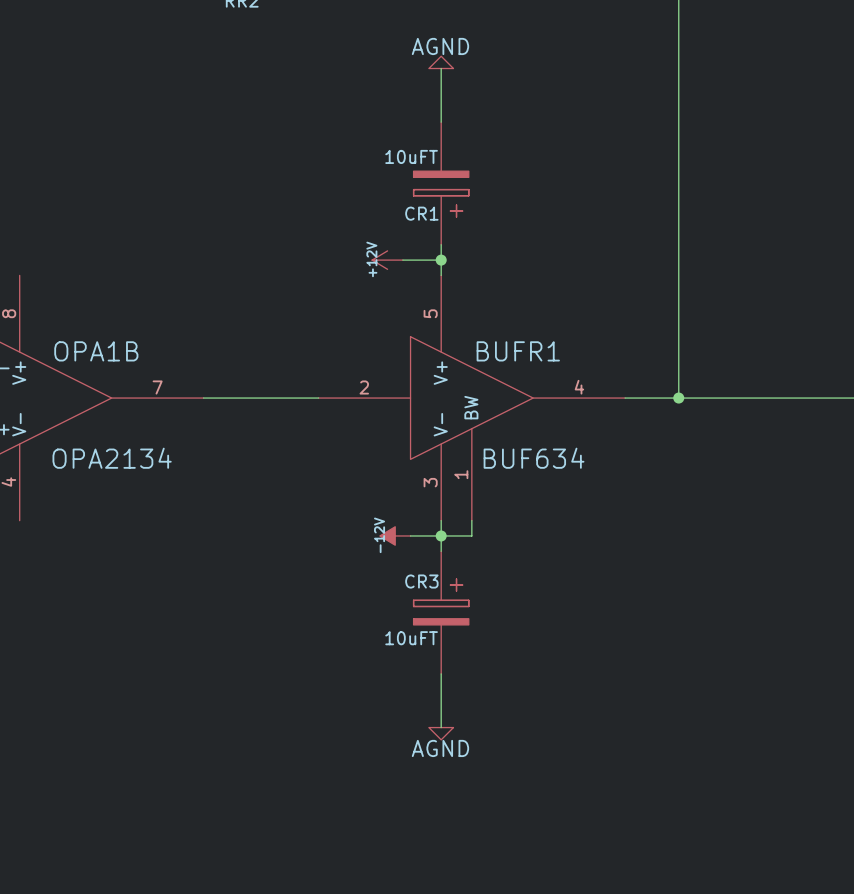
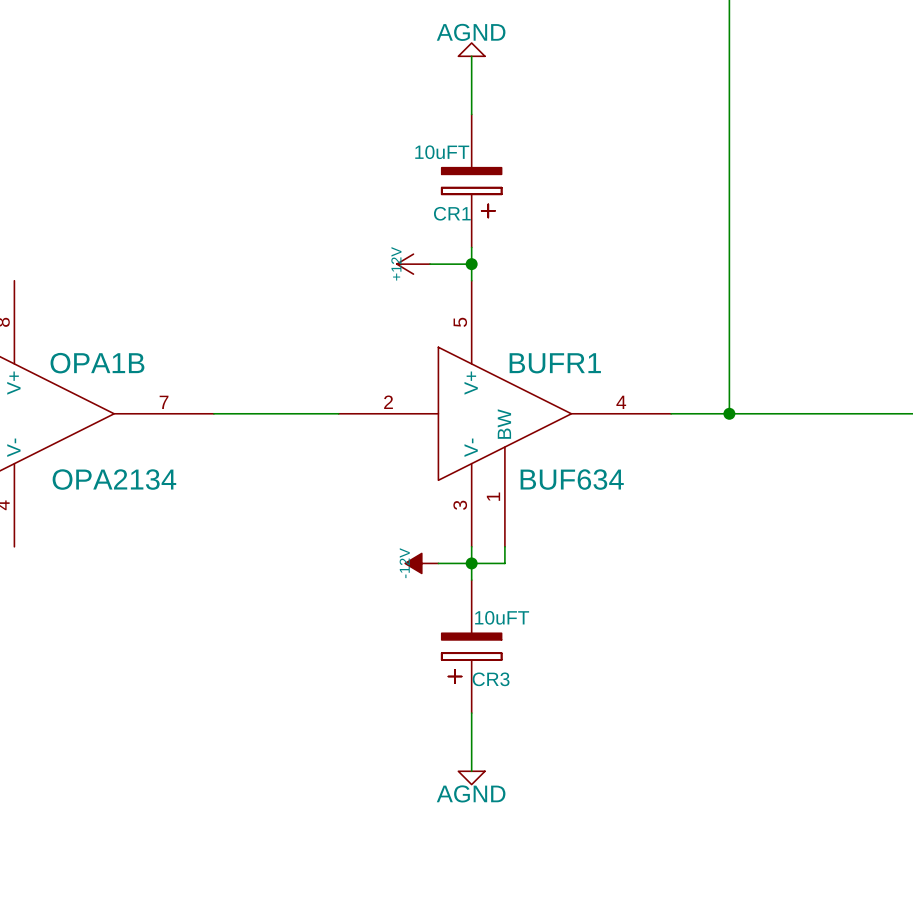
CR3 rotation: 0° (441, 601) -> 180° (471, 658)

